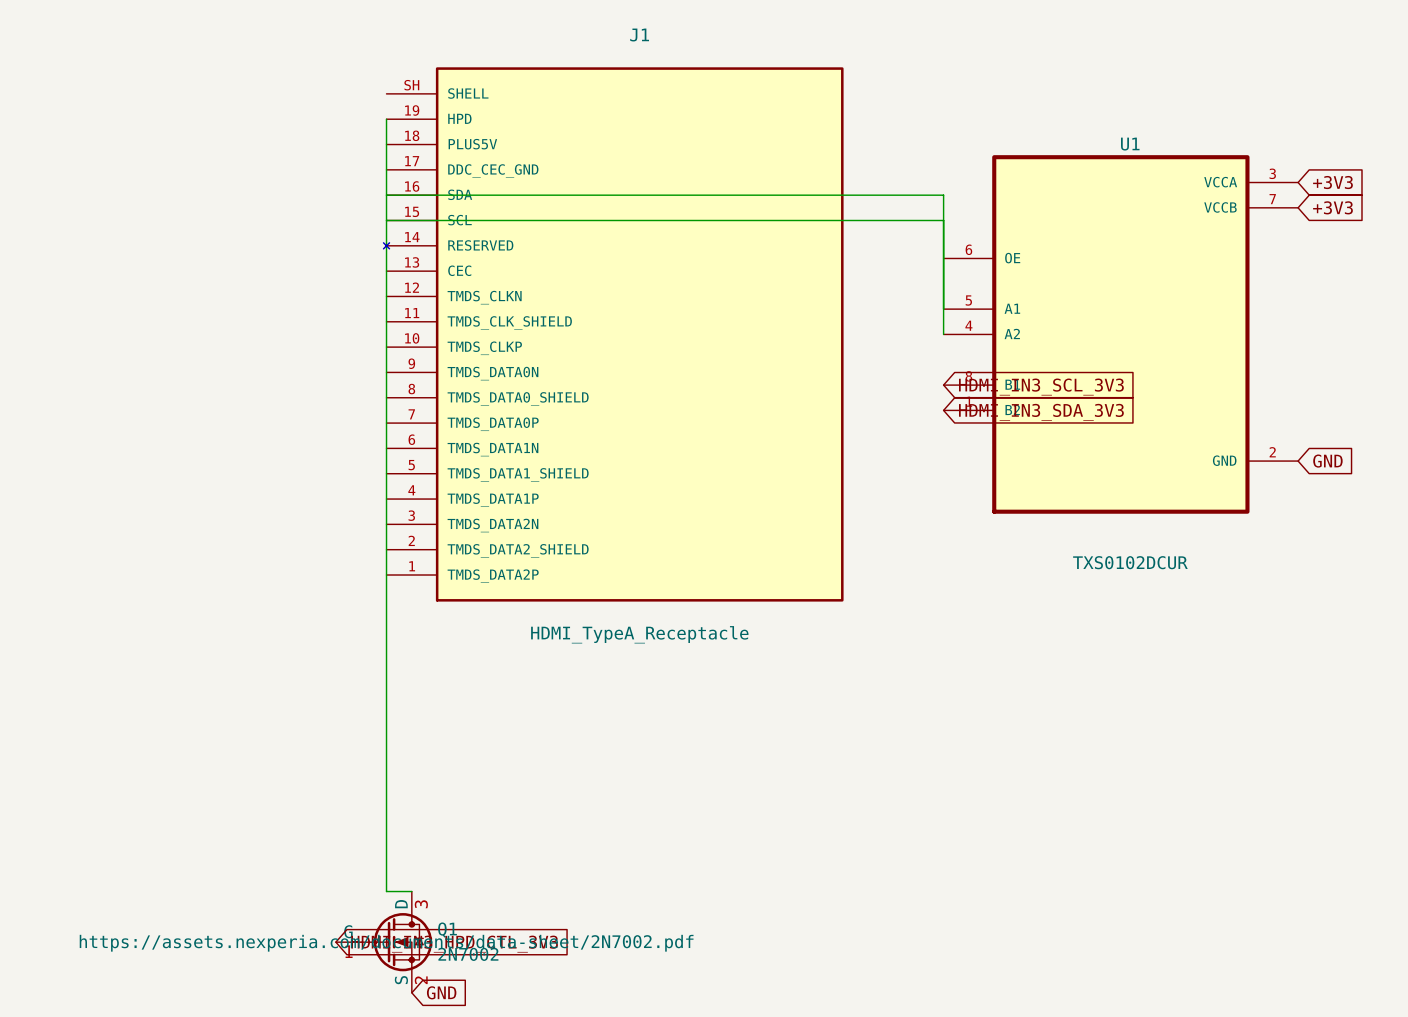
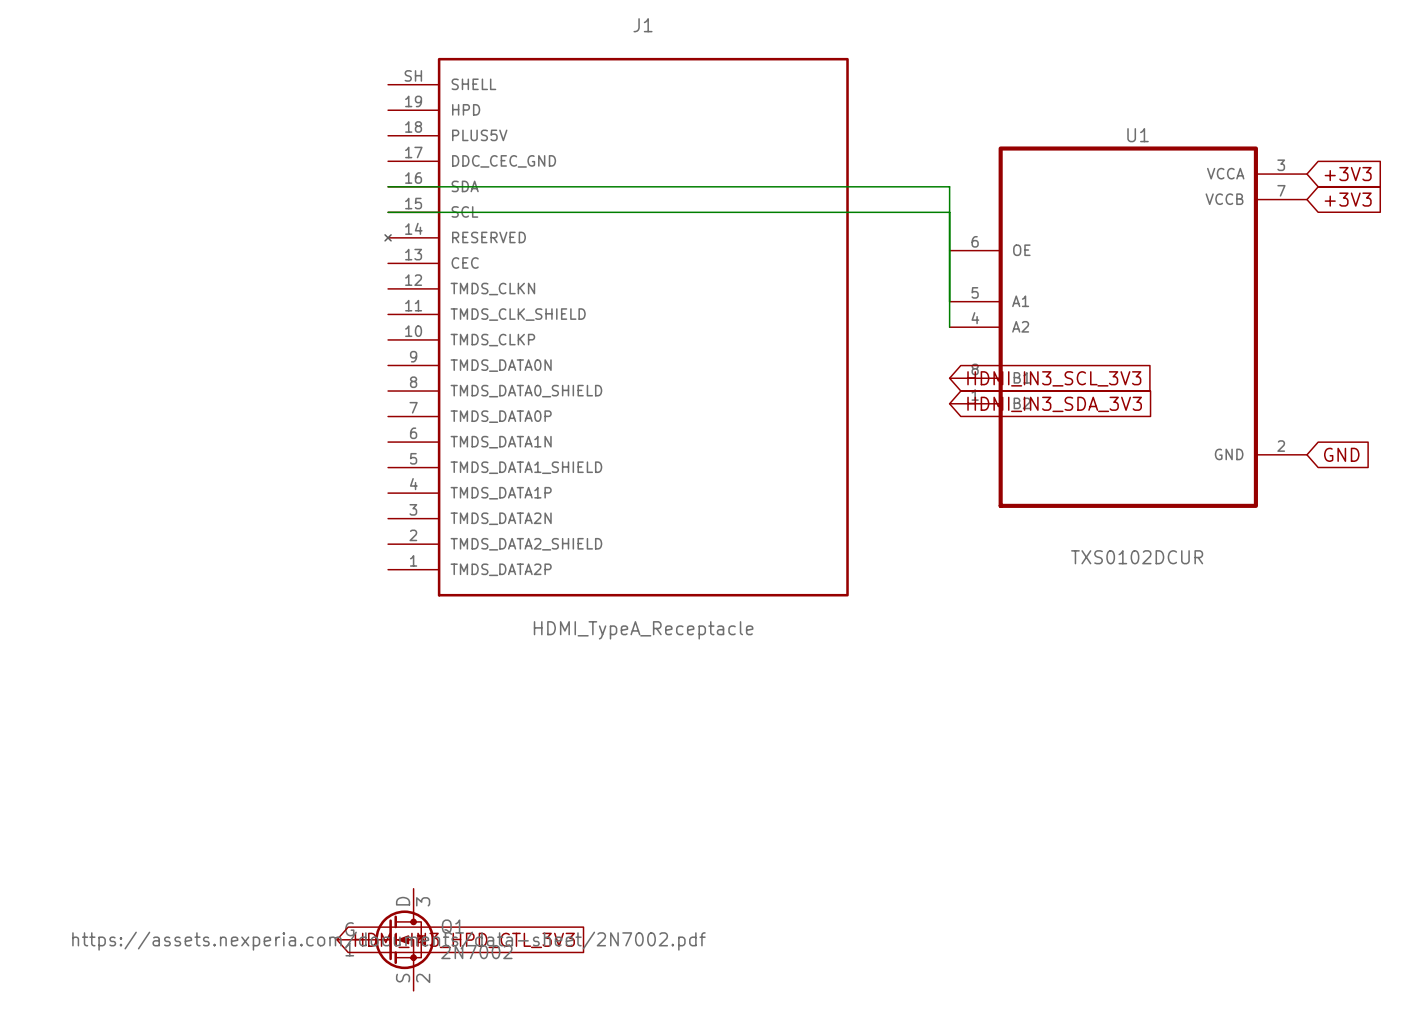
wire: (386, 119) (386, 891) (411, 891) -> none
global label: GND (441, 992) -> none

